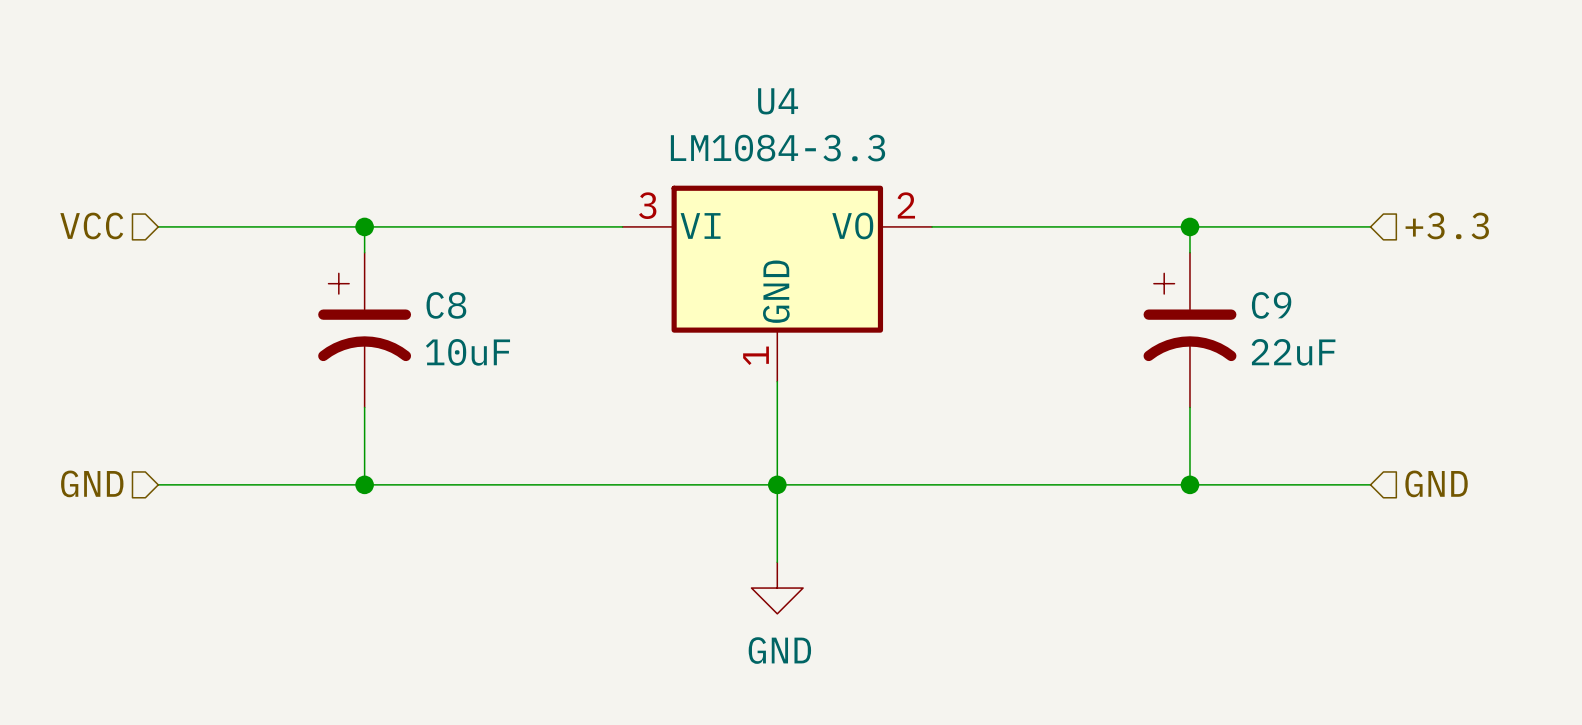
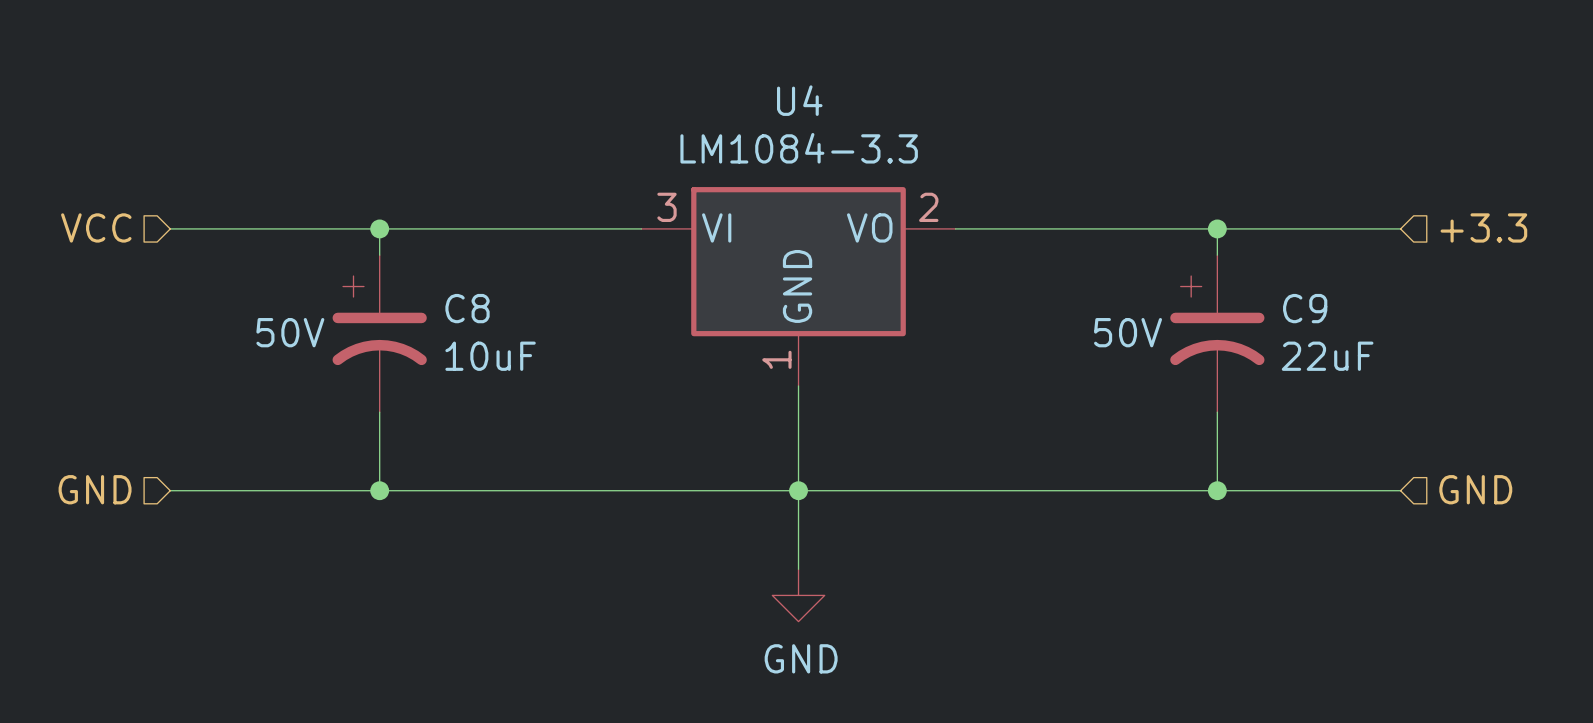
C8 text: none -> 50V (290, 332)
C9 text: none -> 50V (1128, 332)

